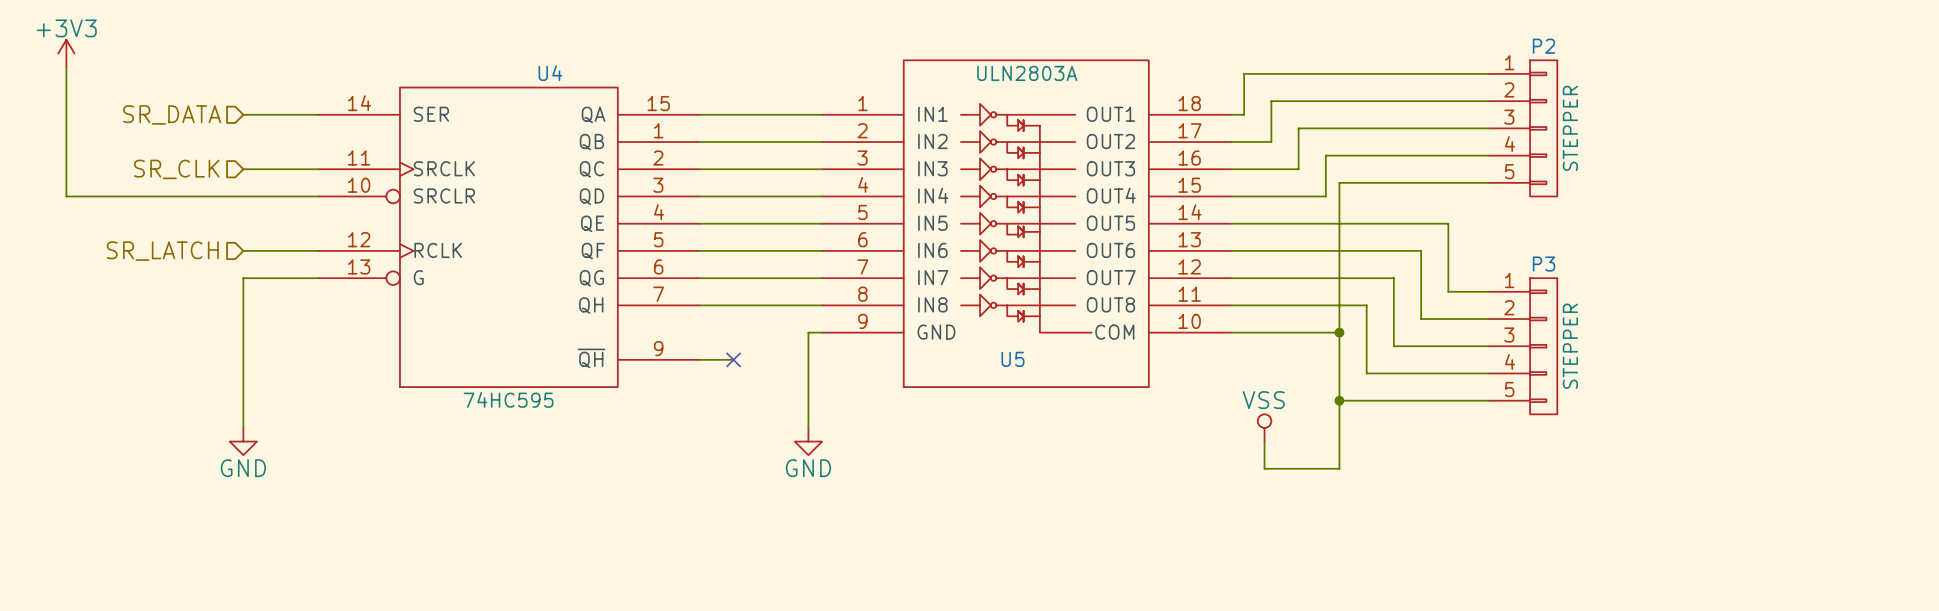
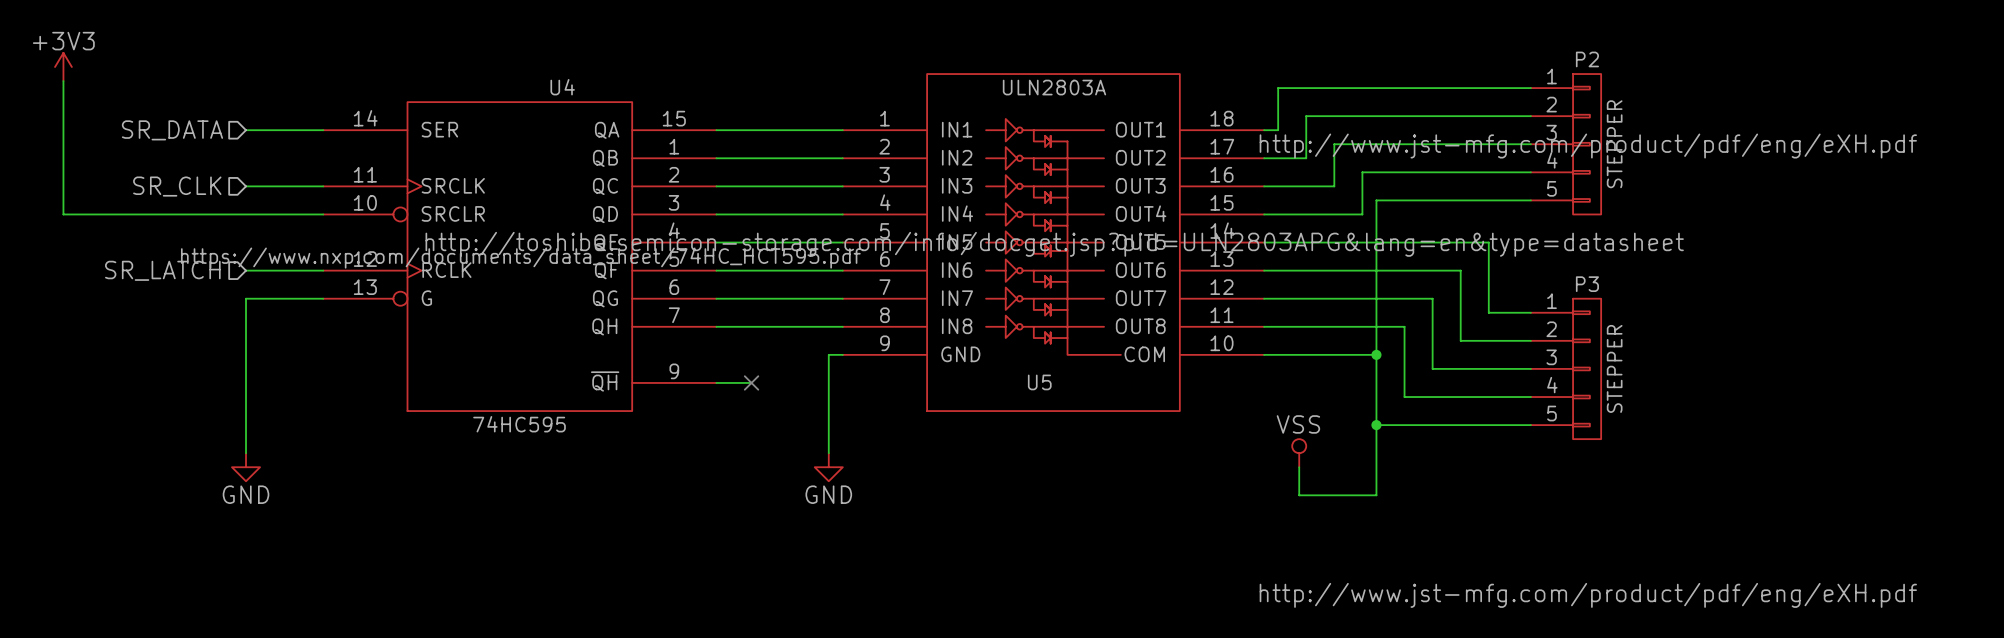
P2 text: none -> http://www.jst-mfg.com/product/pdf/eng/eXH.pdf (1588, 146)
U5 text: none -> http://toshiba.semicon-storage.com/info/docget.jsp?pid=ULN2803APG&lang=en&type=datasheet (1054, 244)
U4 text: none -> https://www.nxp.com/documents/data_sheet/74HC_HCT595.pdf (520, 258)
P3 text: none -> http://www.jst-mfg.com/product/pdf/eng/eXH.pdf (1588, 595)

